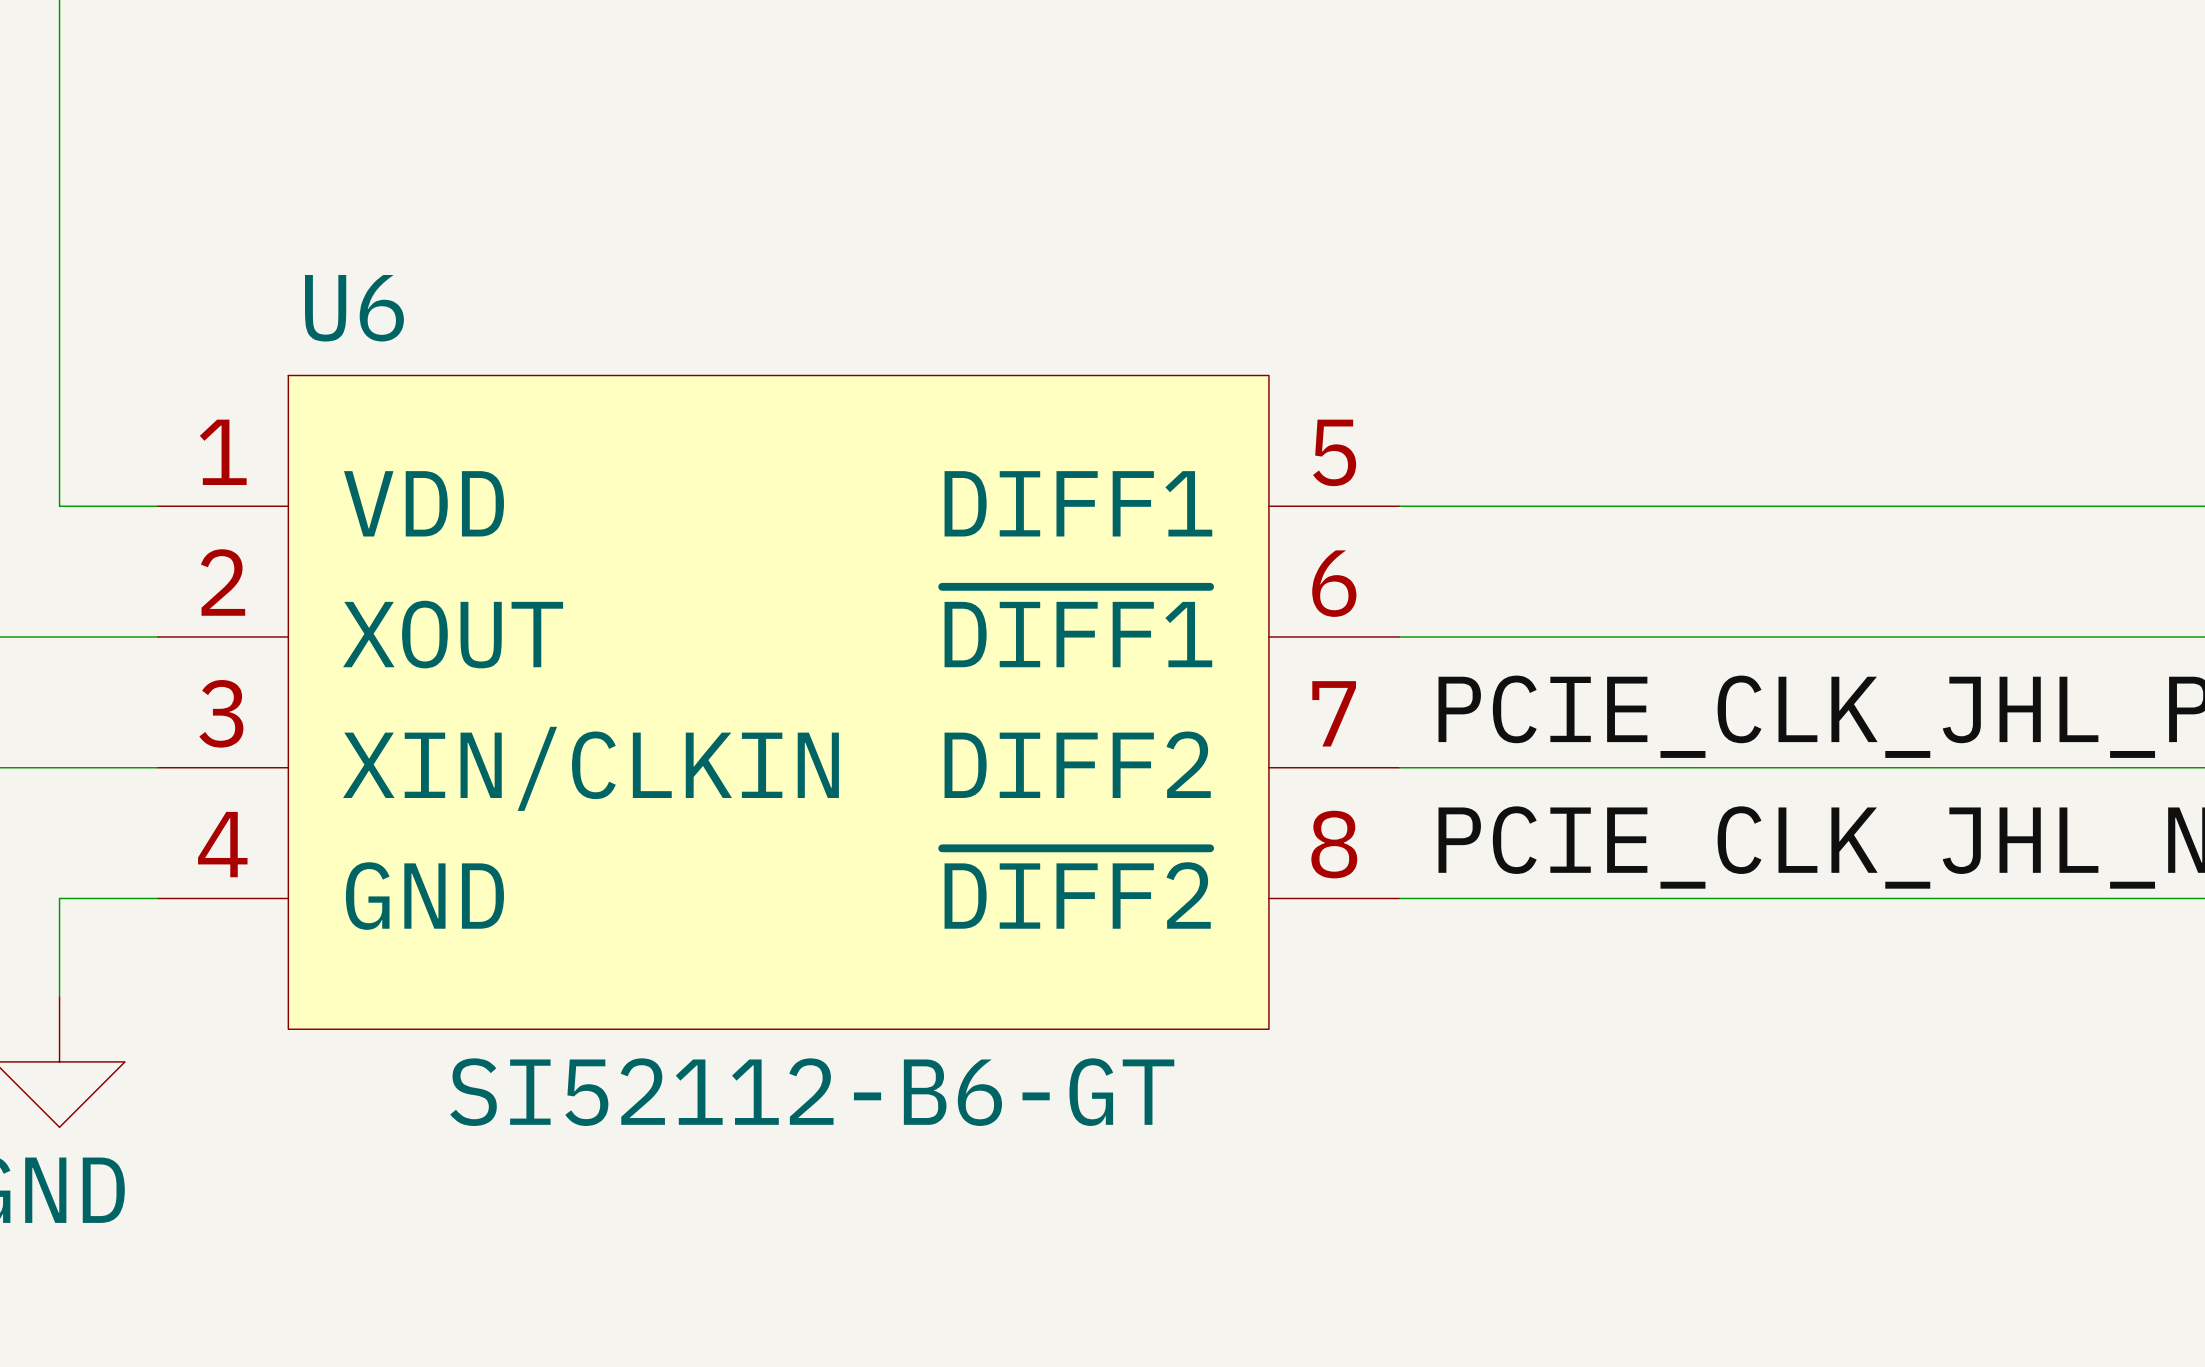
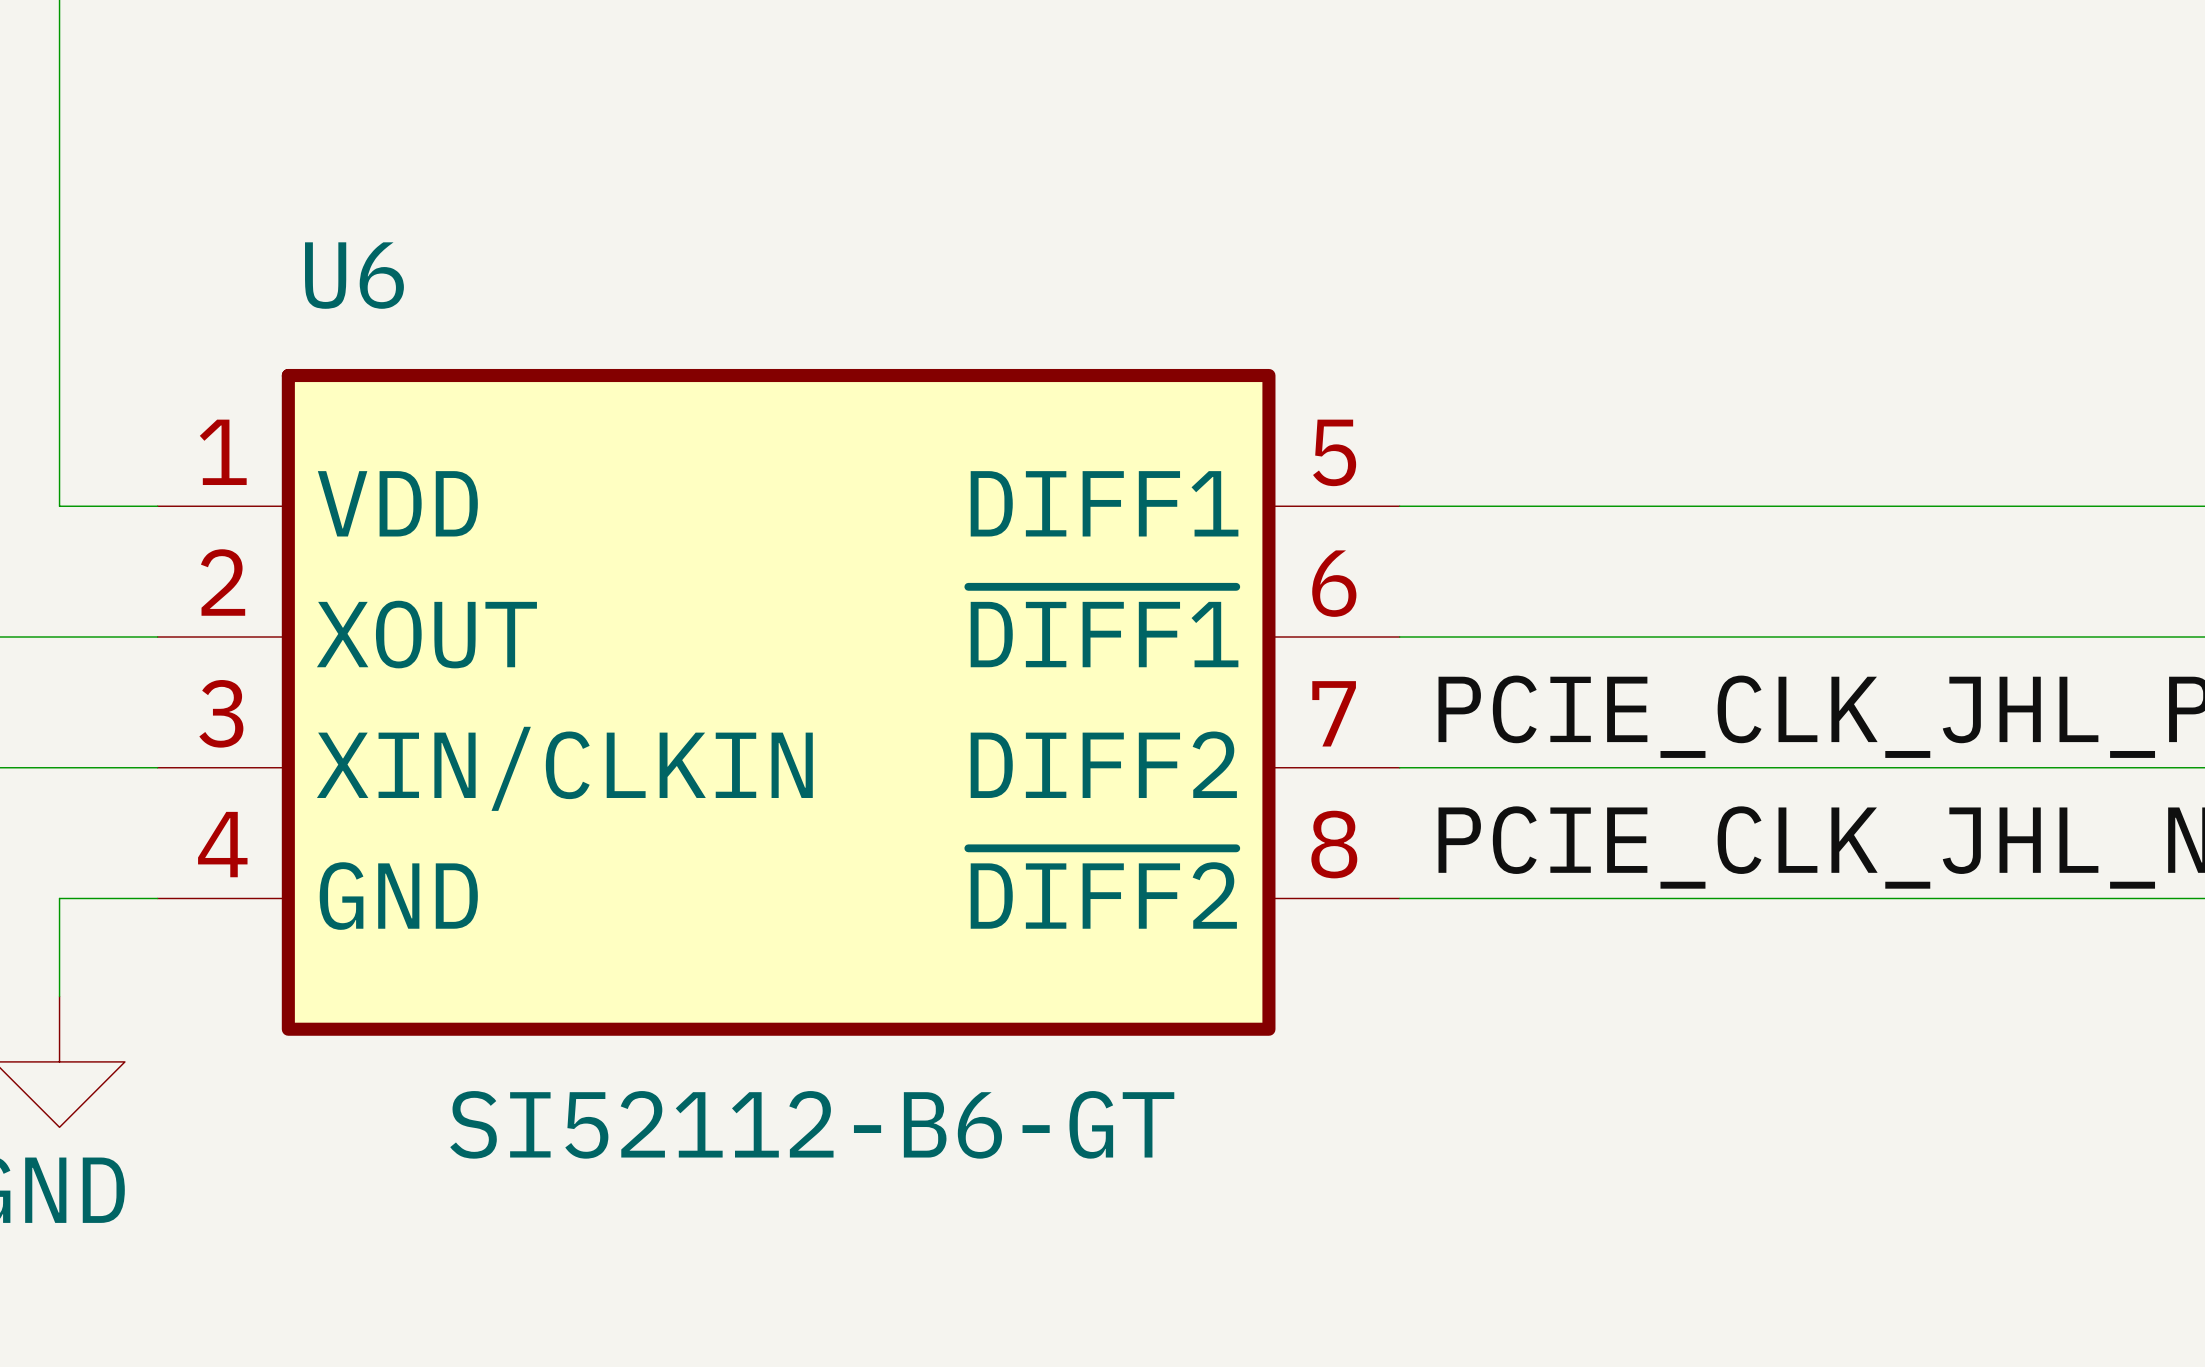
U6 name position: U6 (354, 308) -> U6 (354, 275)
U6 symbol: [157, 375, 1400, 1030] -> [157, 368, 1400, 1036]
U6 value position: SI52112-B6-GT (812, 1092) -> SI52112-B6-GT (812, 1124)

